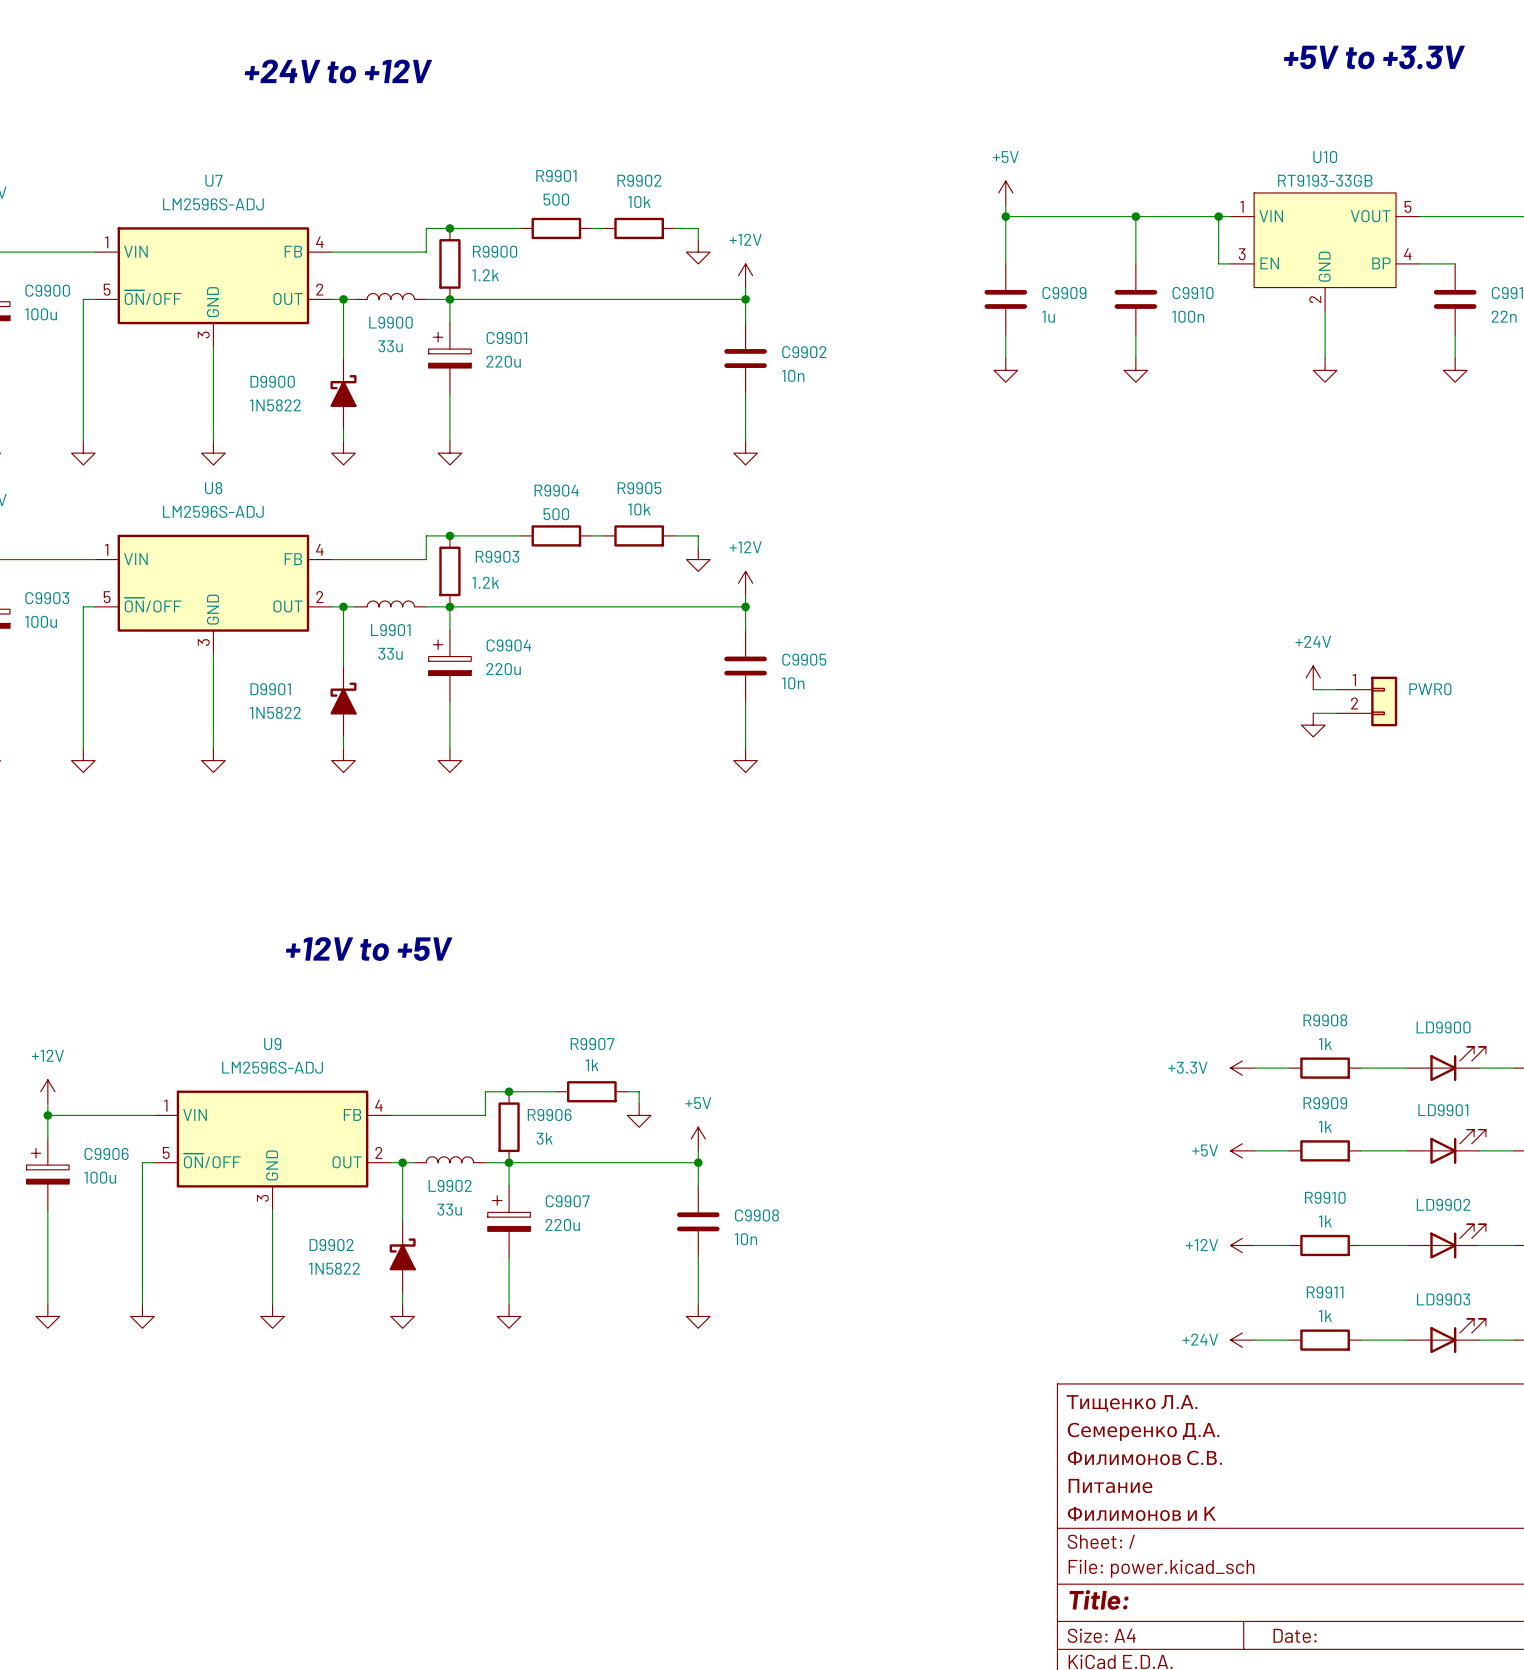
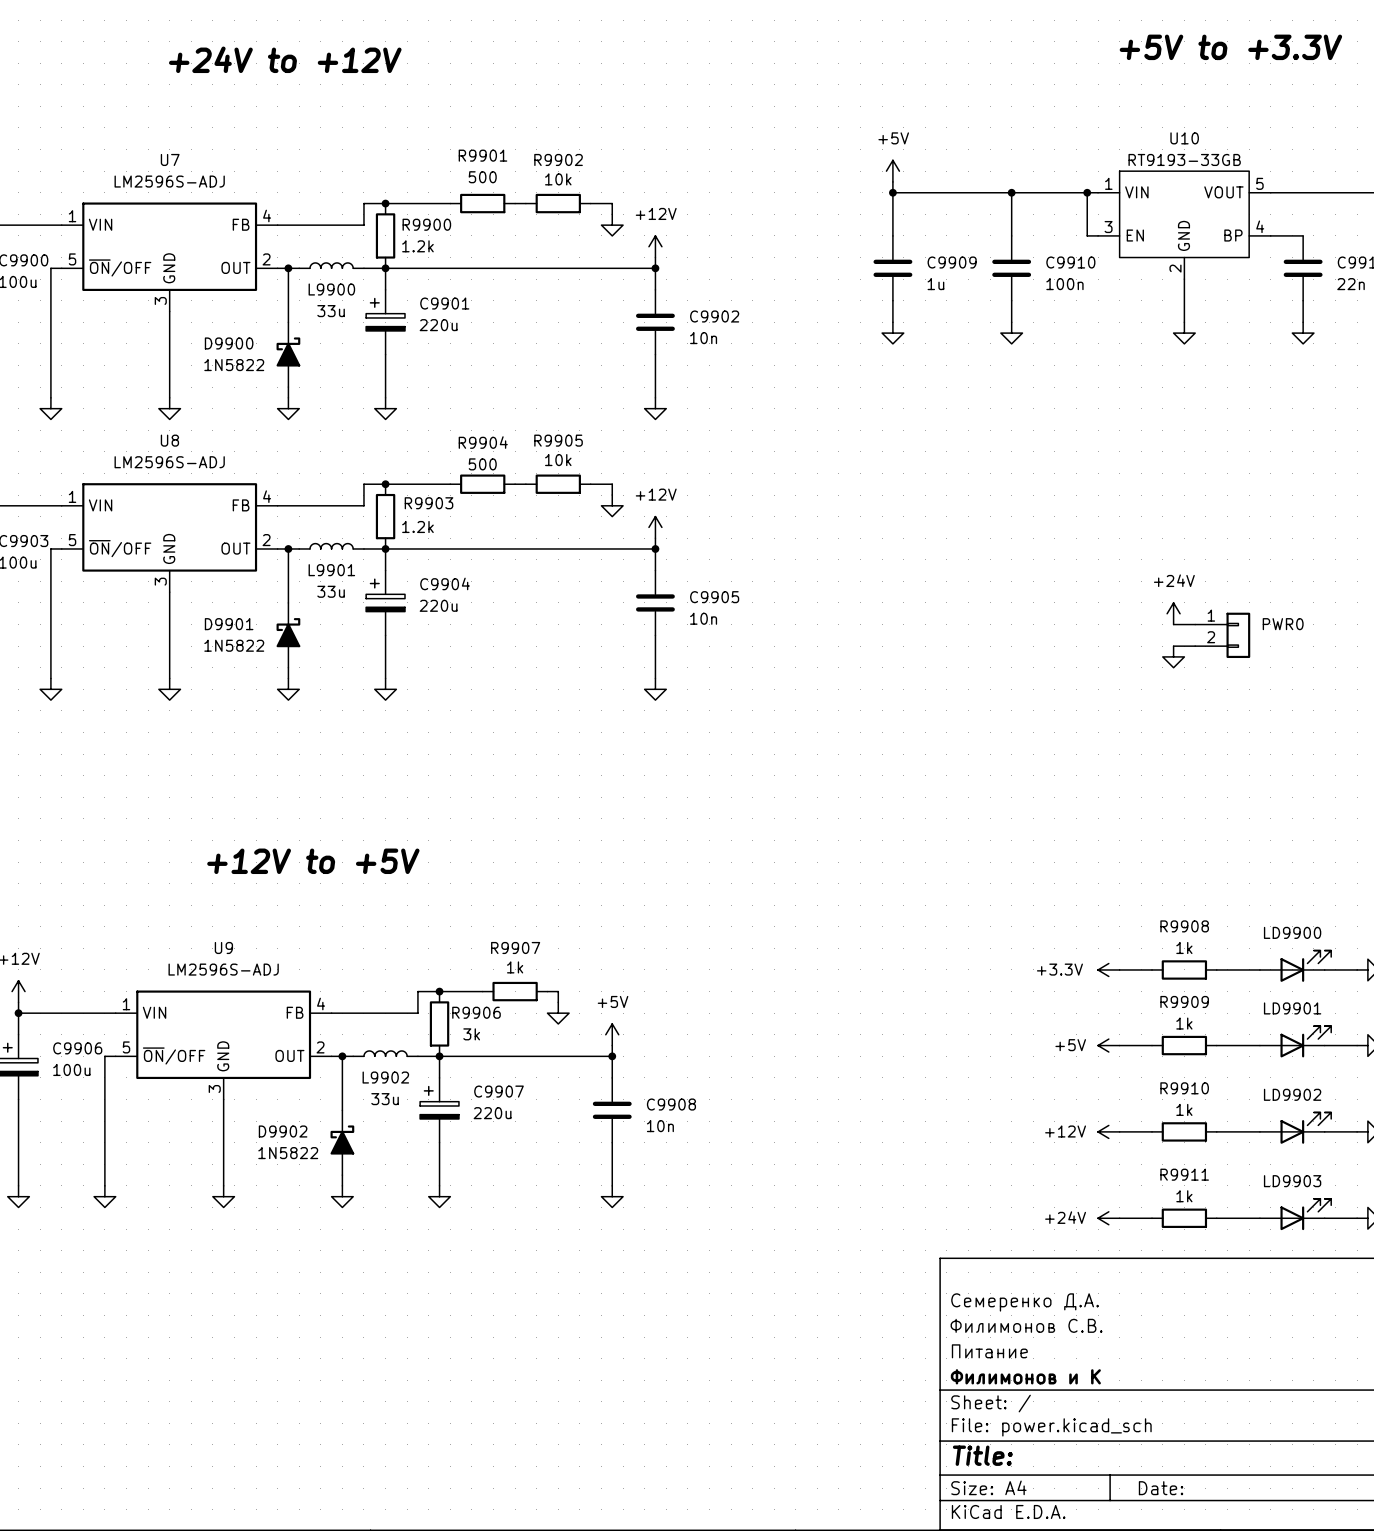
title block: Тищенко Л.А. (1132, 1403) -> none

